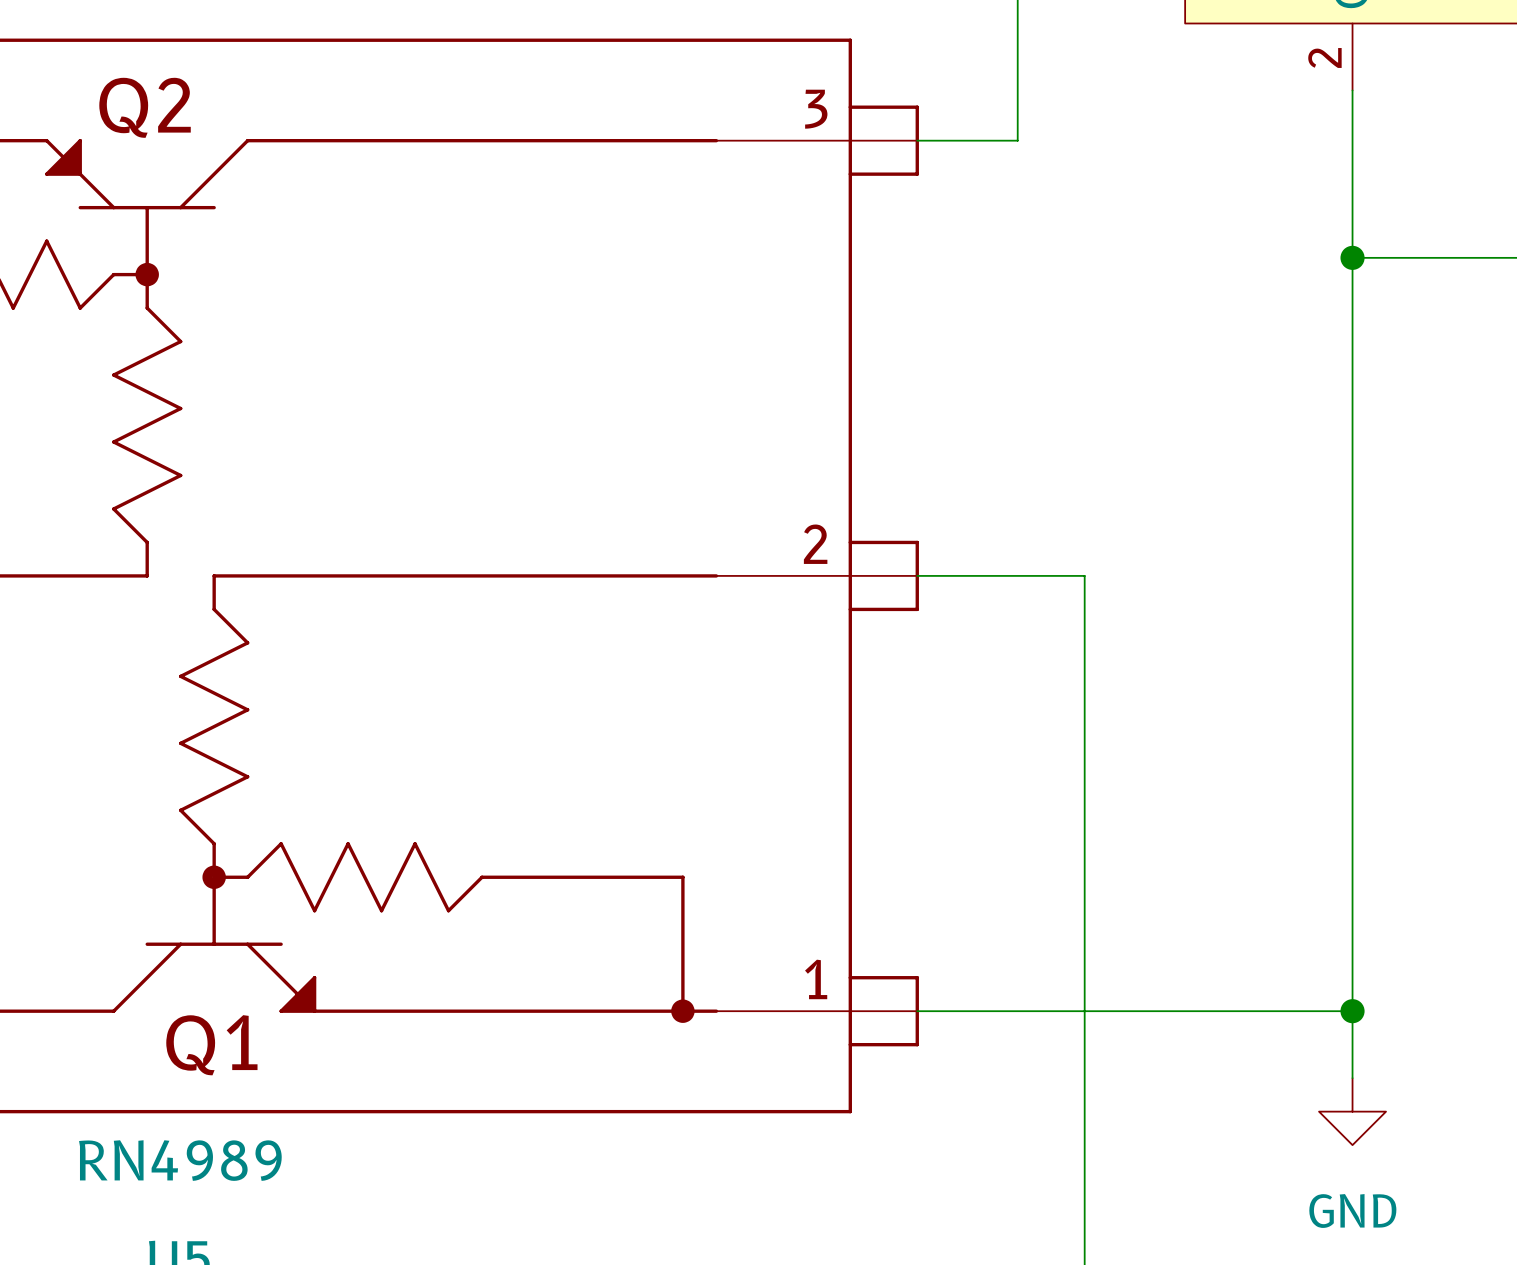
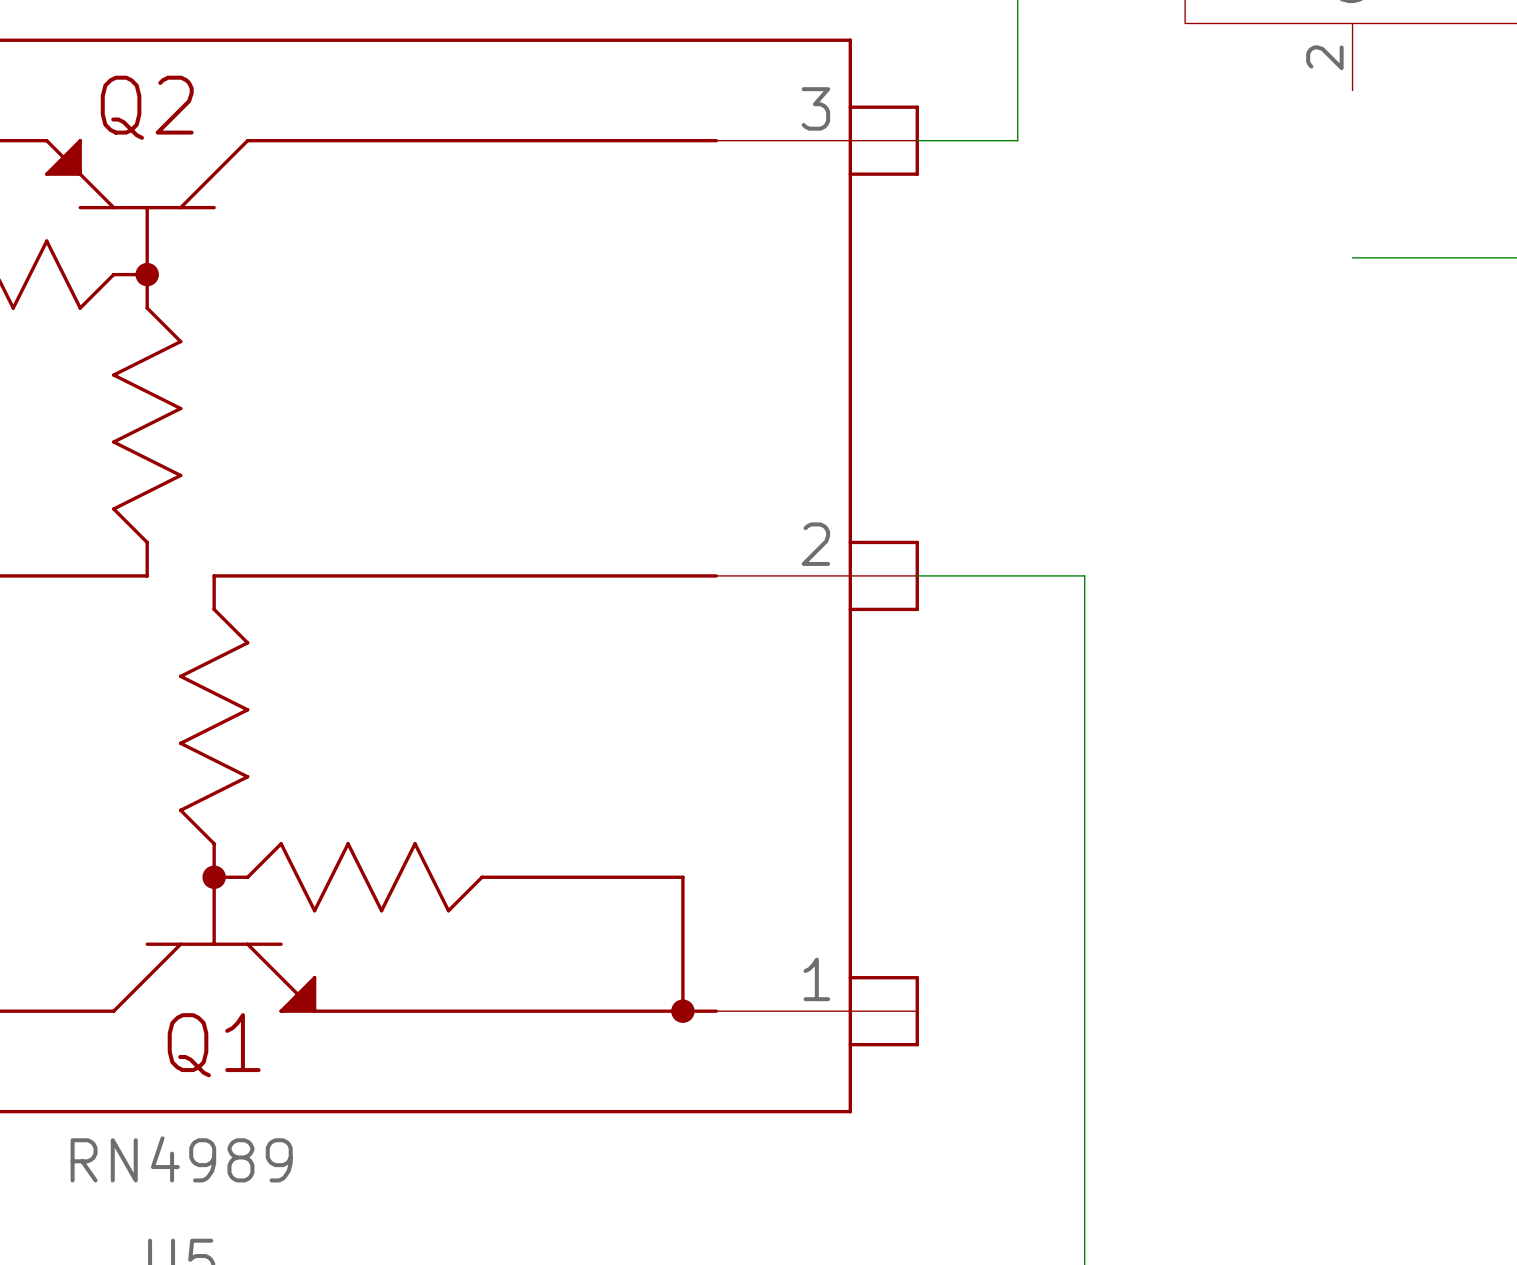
wire: (1352, 90) (1352, 1078) -> none
junction: (1352, 257) -> none
wire: (917, 1011) (1352, 1011) -> none
junction: (1352, 1011) -> none
power symbol: GND (1352, 1111) -> none

